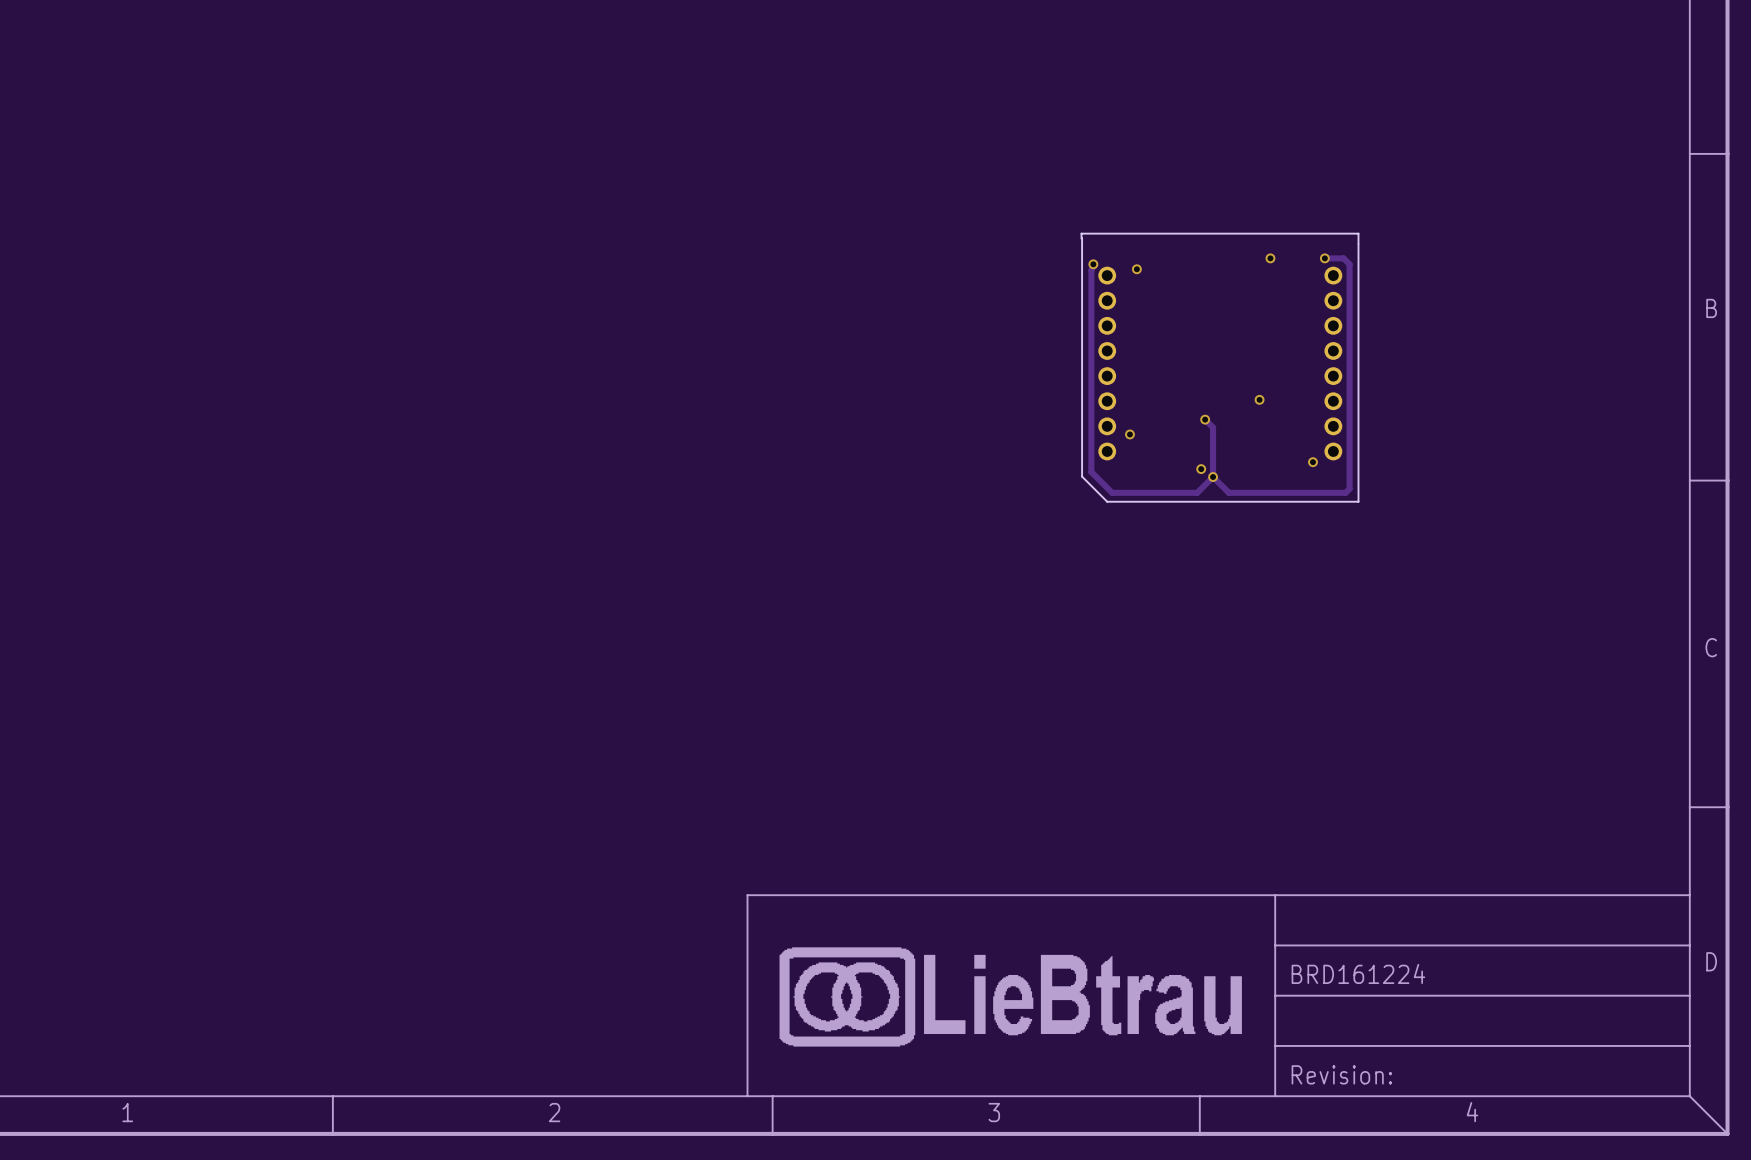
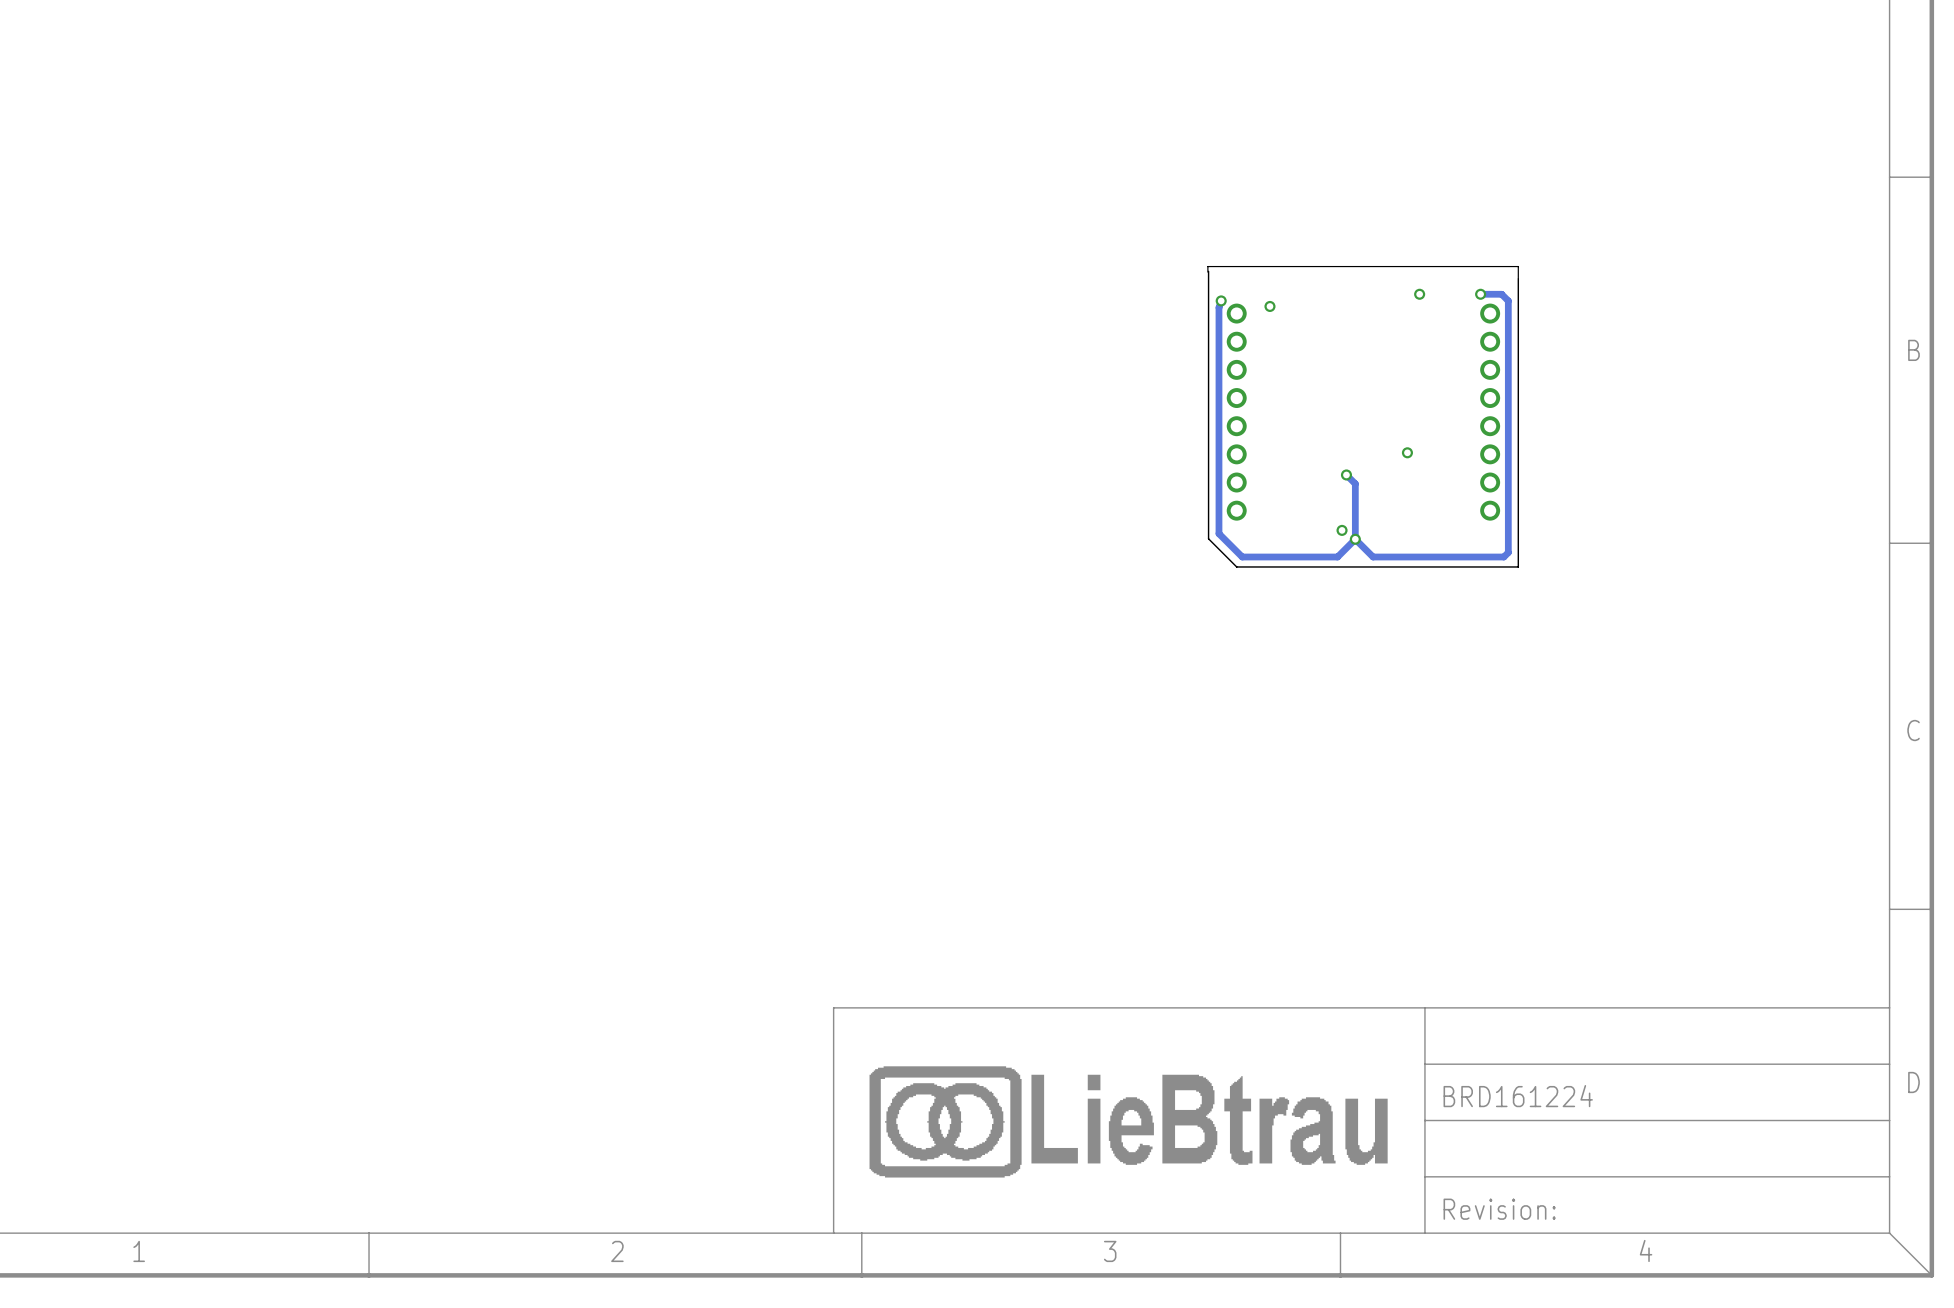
via: (1129, 434) -> none
via: (1312, 462) -> none

